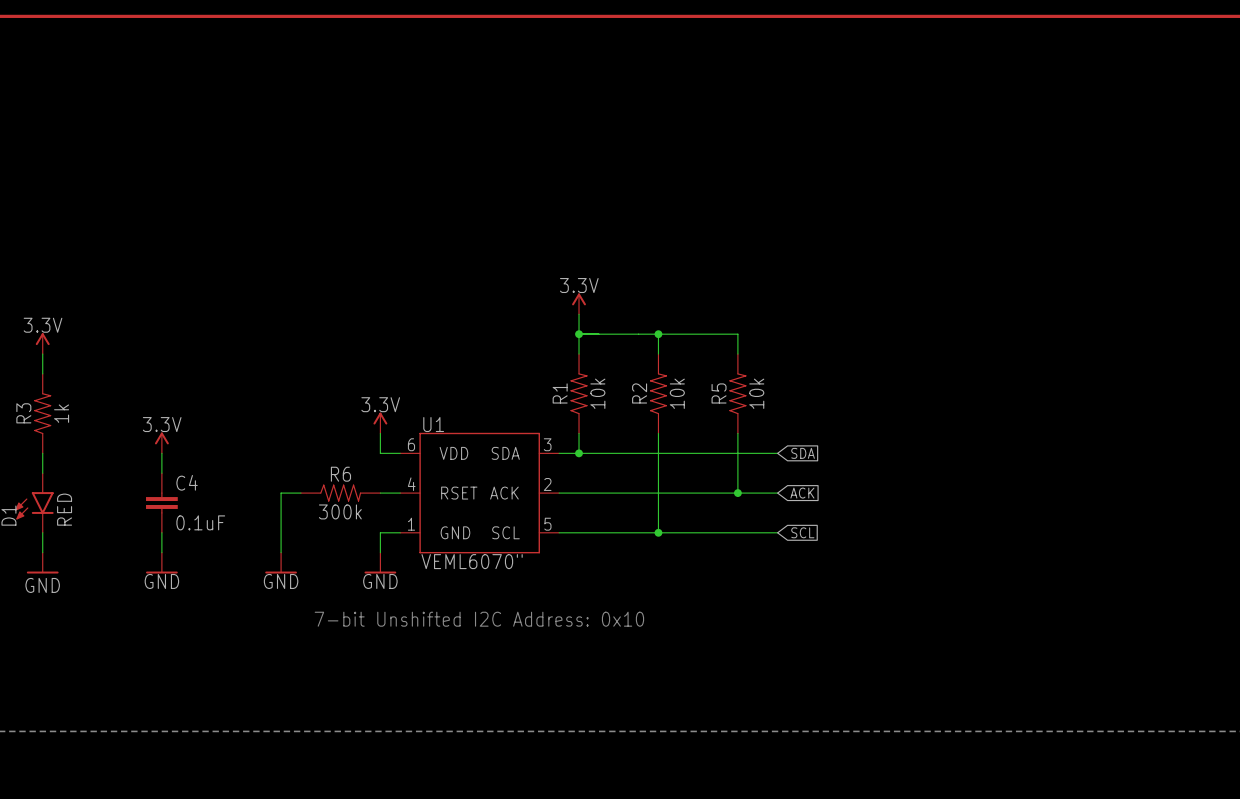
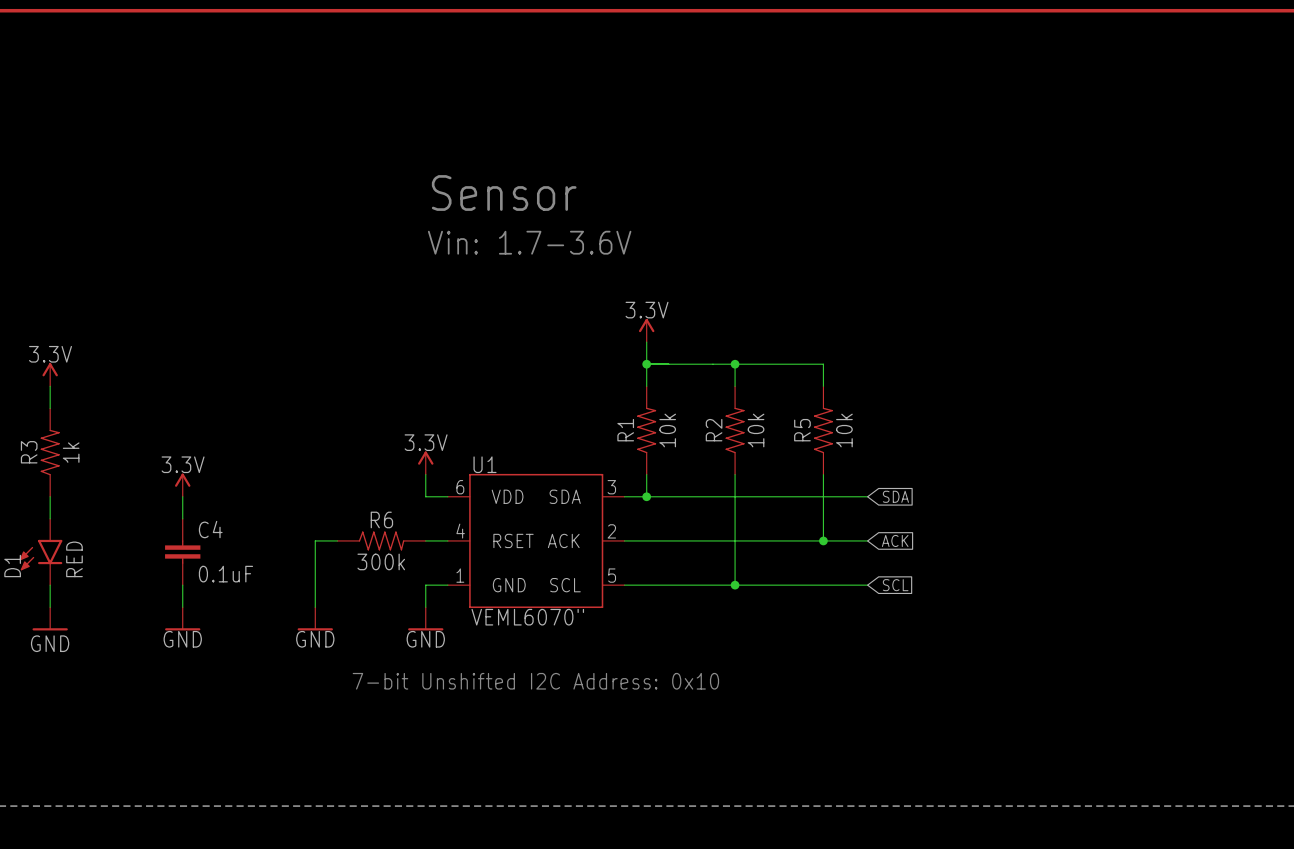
text: none -> Sensor (504, 192)
text: none -> Vin: 1.7-3.6V (529, 242)

